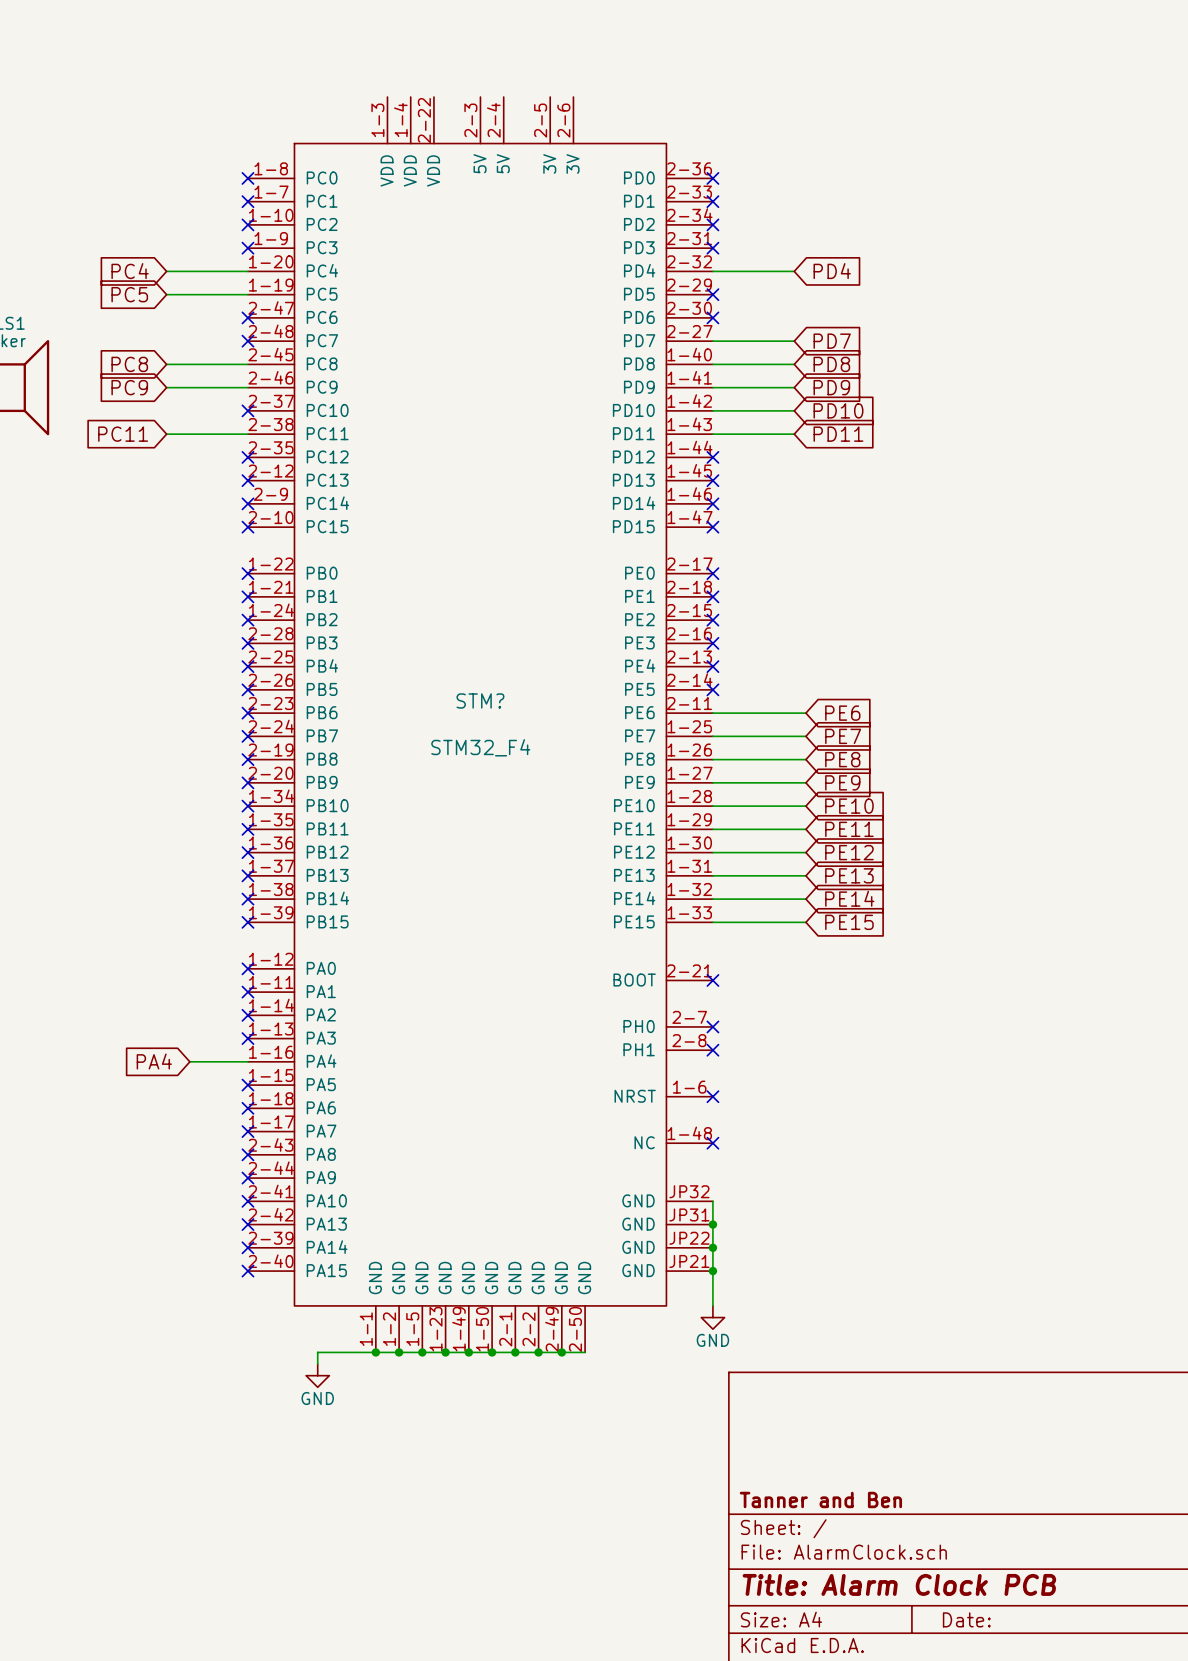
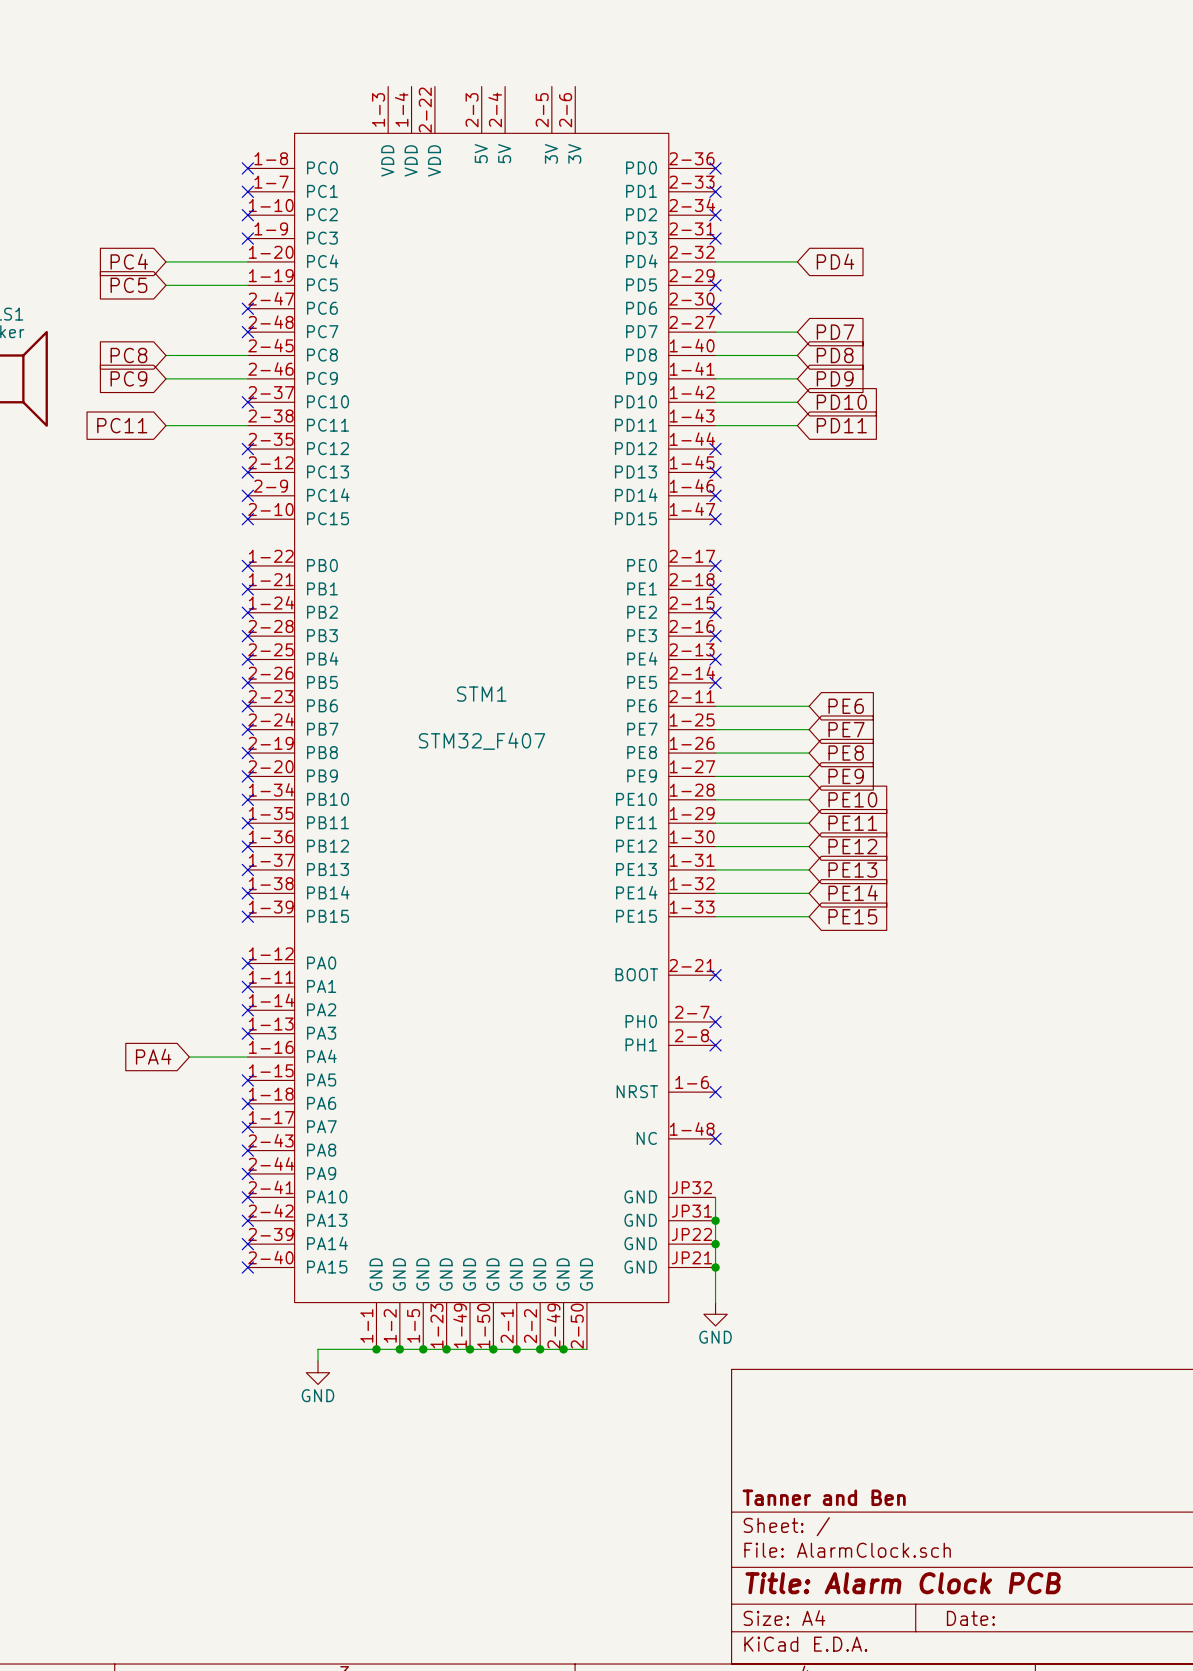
STM? name: STM? (480, 700) -> STM1 (481, 694)
STM? value: STM32_F4 (480, 747) -> STM32_F407 (482, 741)

